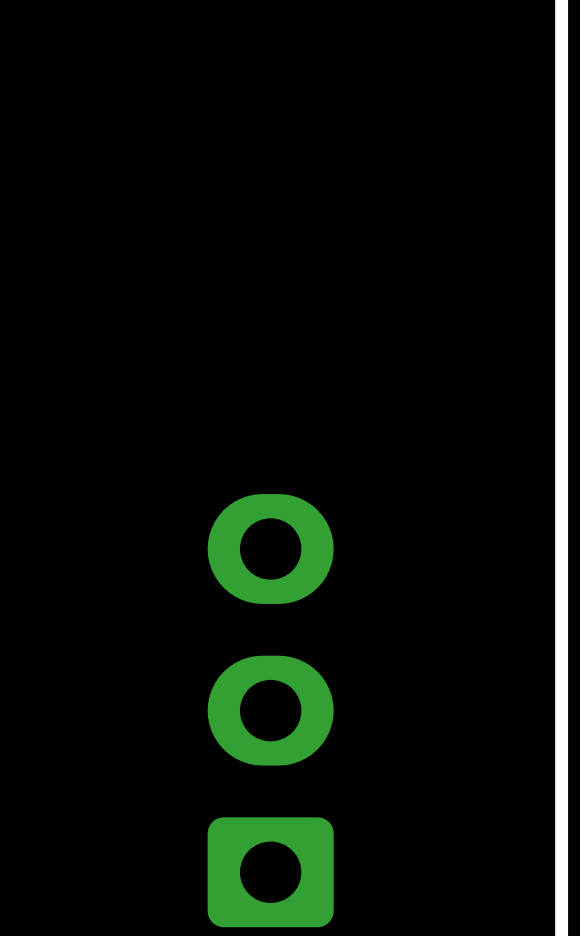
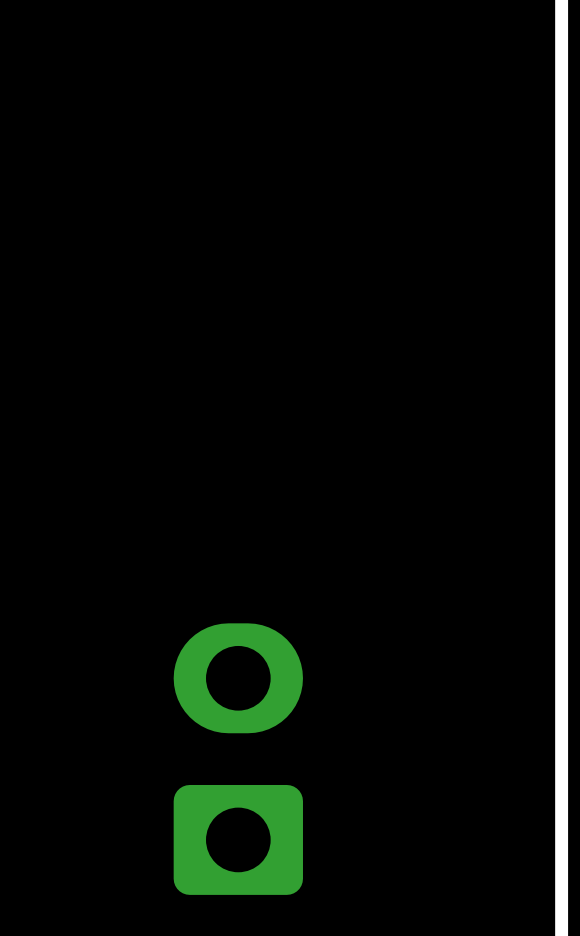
part footprint: [207, 494, 334, 928] -> [173, 623, 303, 895]

